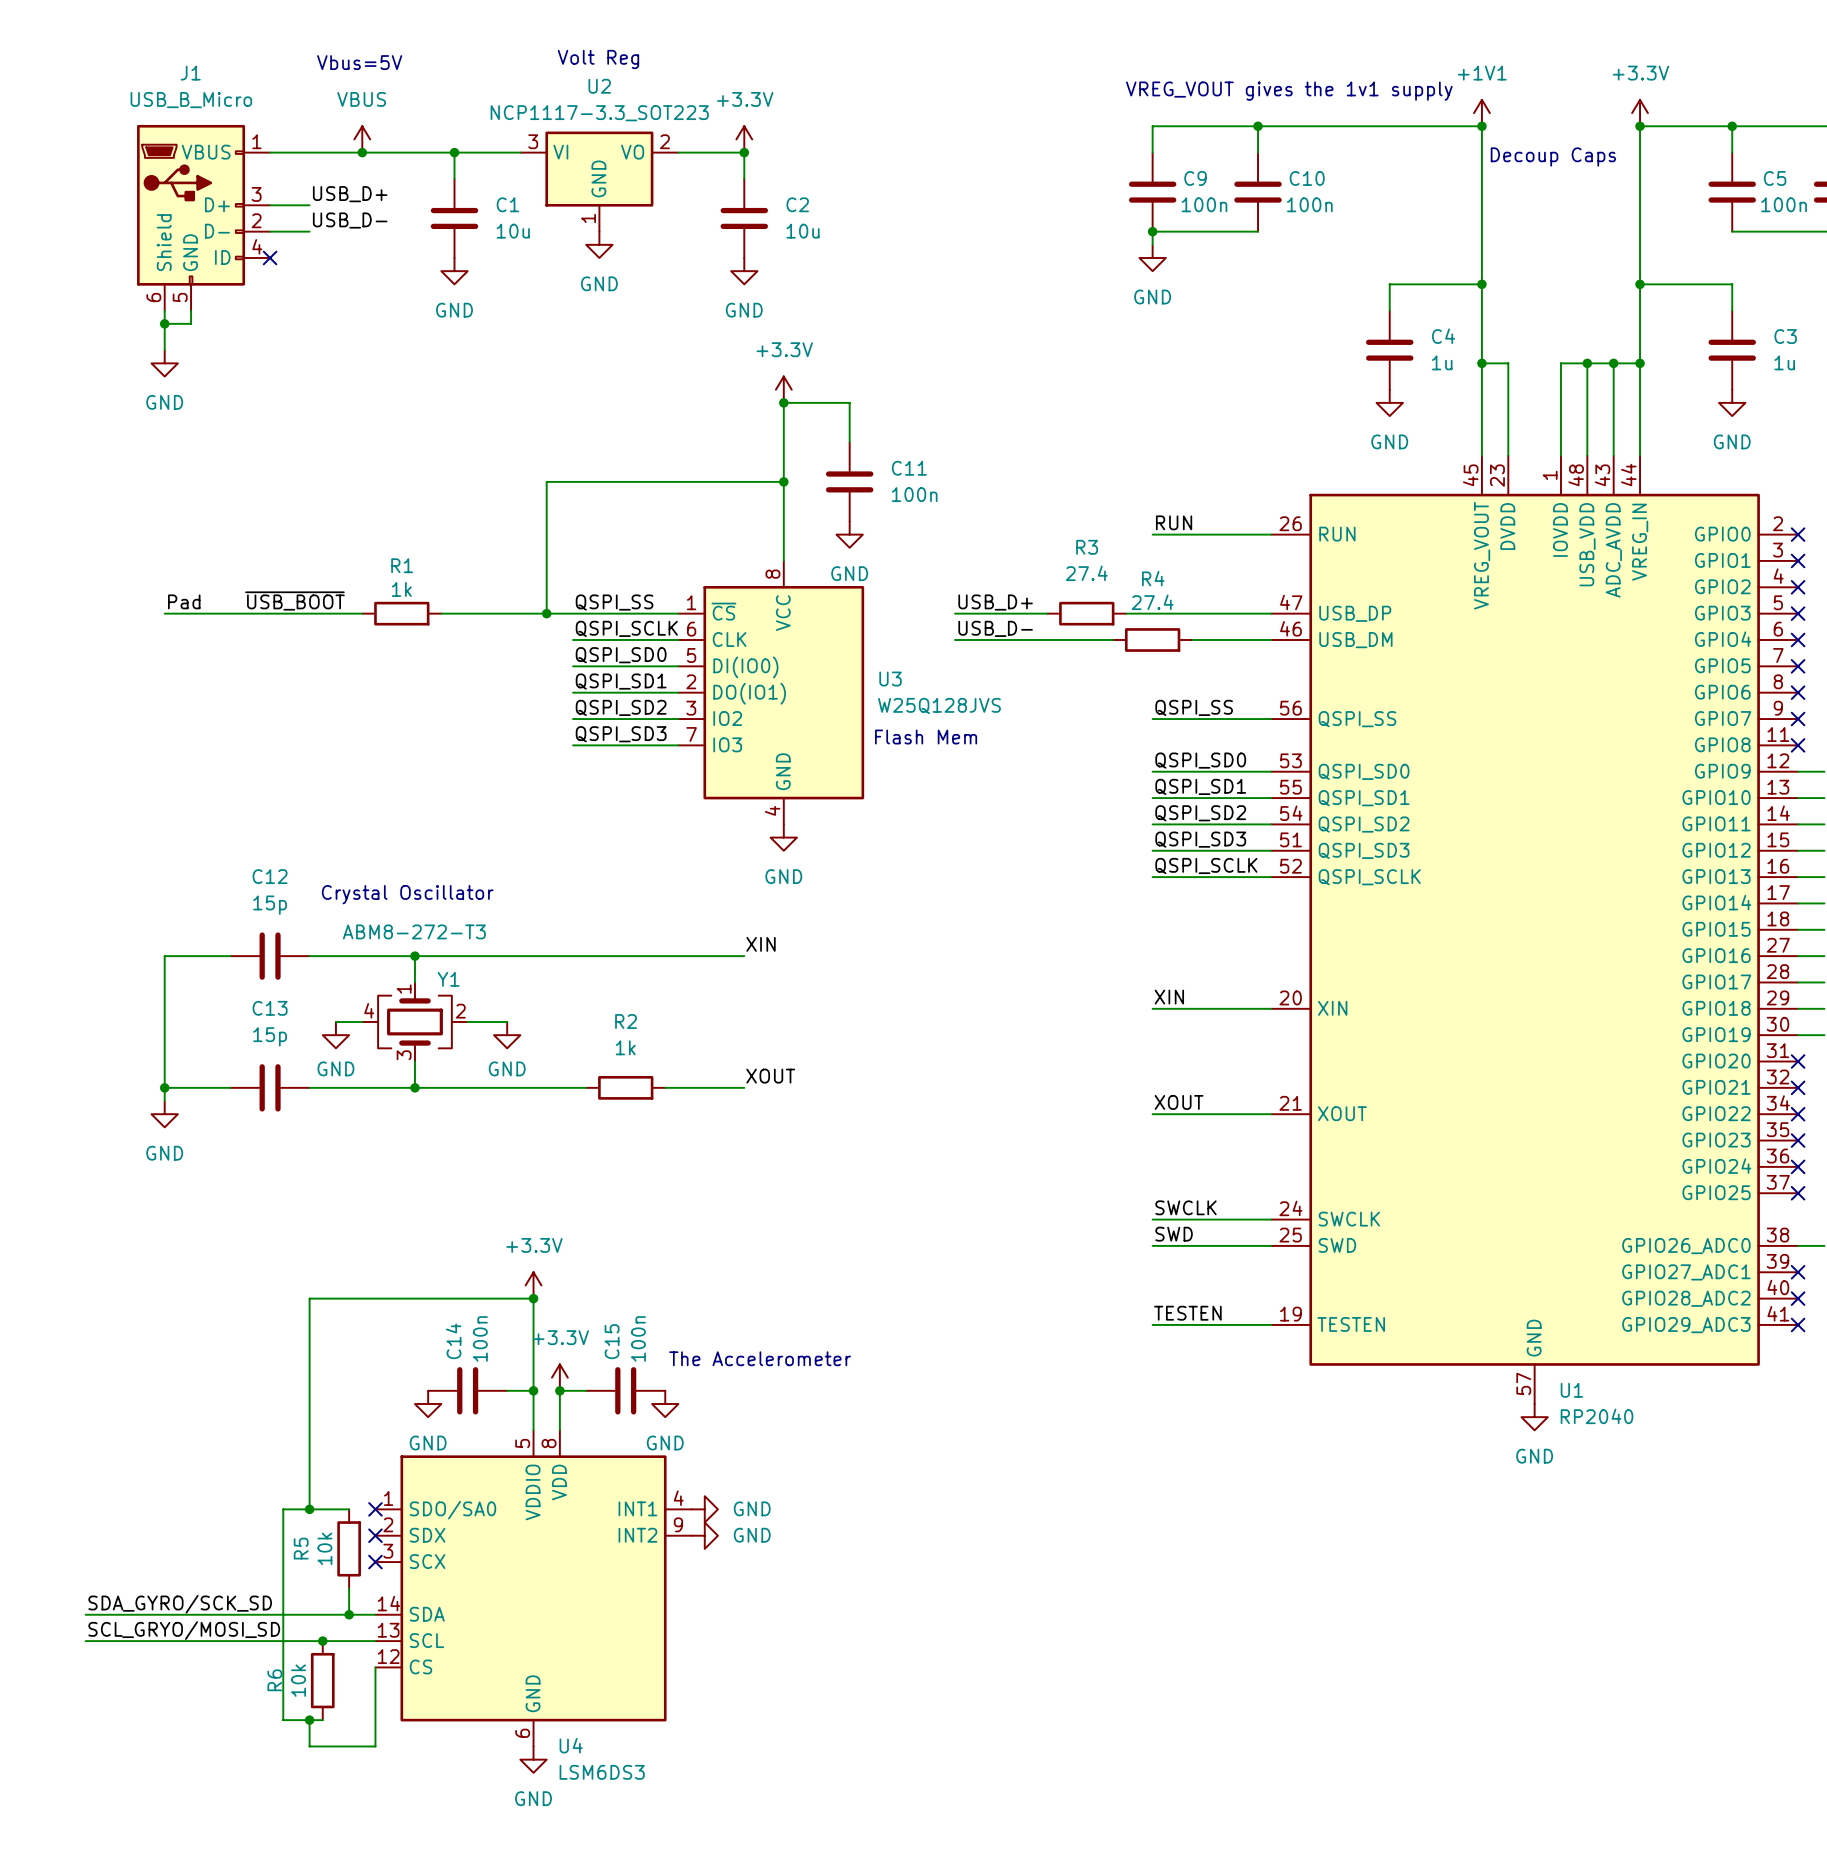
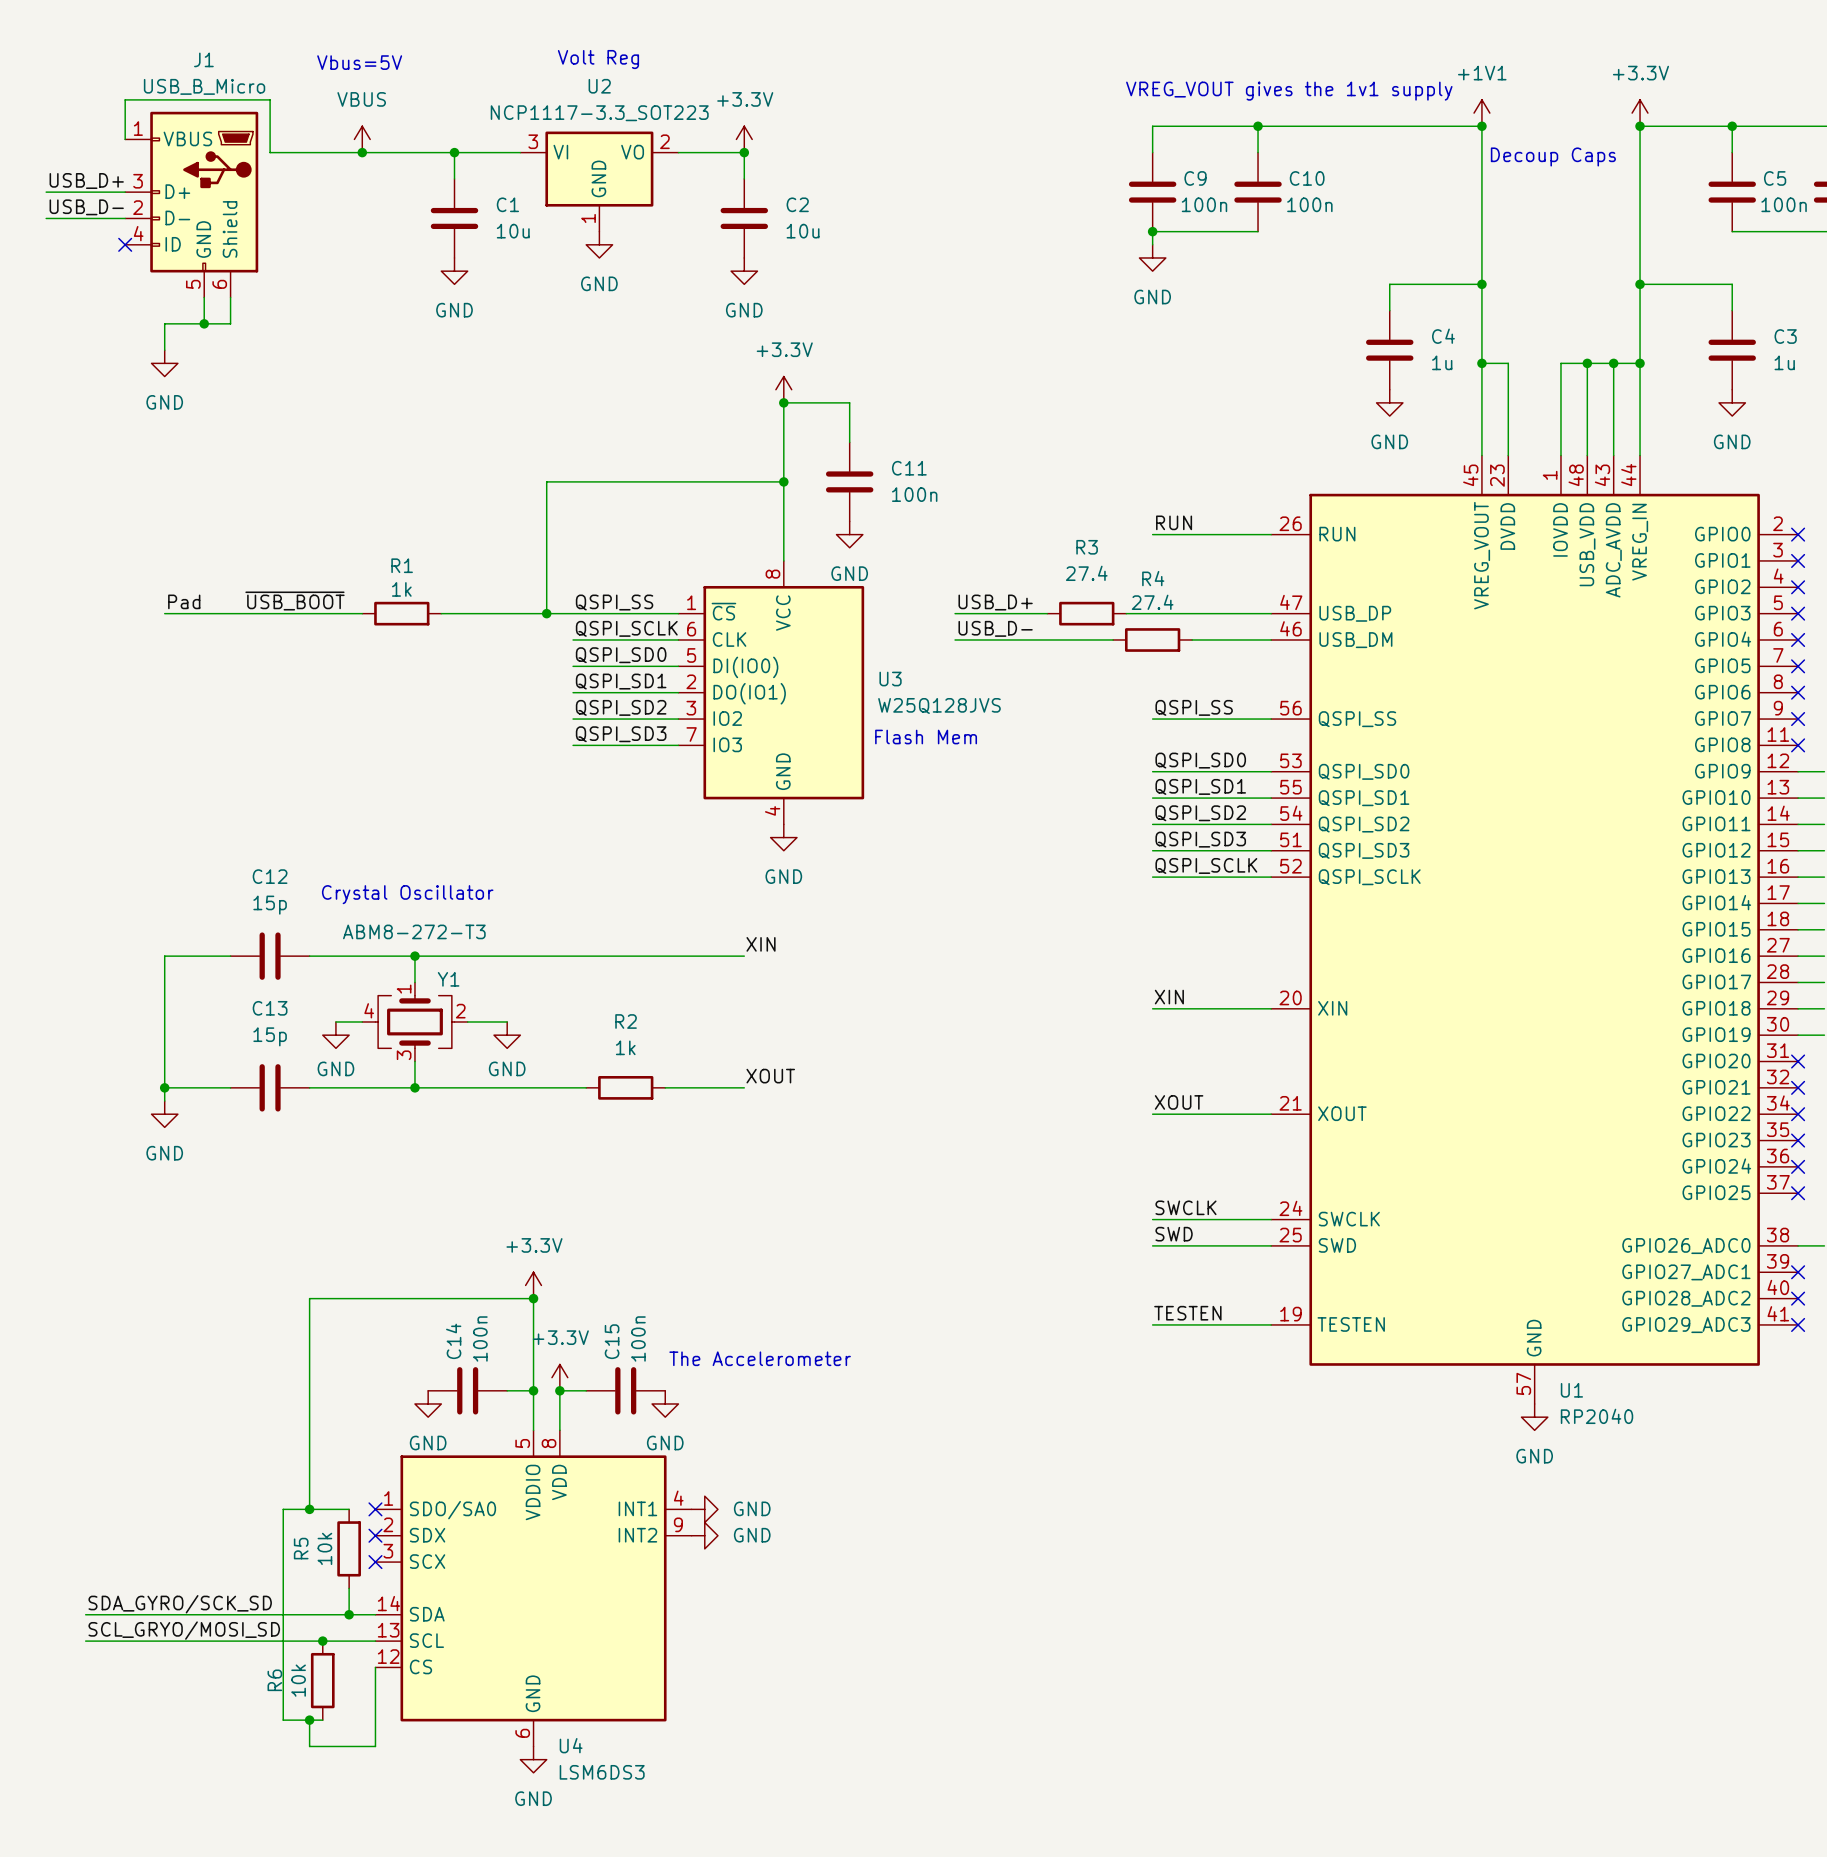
wire: none -> (125, 139) (125, 99) (270, 99) (270, 152)
label: none -> USB_D+ (86, 181)
wire: none -> (46, 192) (125, 192)
label: USB_D+ (350, 194) -> none
J1 flip: as is (191, 205) -> left-right (204, 192)
wire: (270, 205) (309, 205) -> none
label: none -> USB_D- (86, 207)
wire: none -> (46, 218) (125, 218)
label: USB_D- (350, 220) -> none
wire: (270, 231) (309, 231) -> none
no-connect mark: none -> (125, 244)
no-connect mark: (270, 257) -> none
wire: none -> (204, 297) (204, 323)
wire: (164, 310) (164, 323) -> none
wire: (191, 310) (191, 323) -> (230, 297) (230, 323) (191, 323)
junction position: (164, 323) -> (204, 323)

